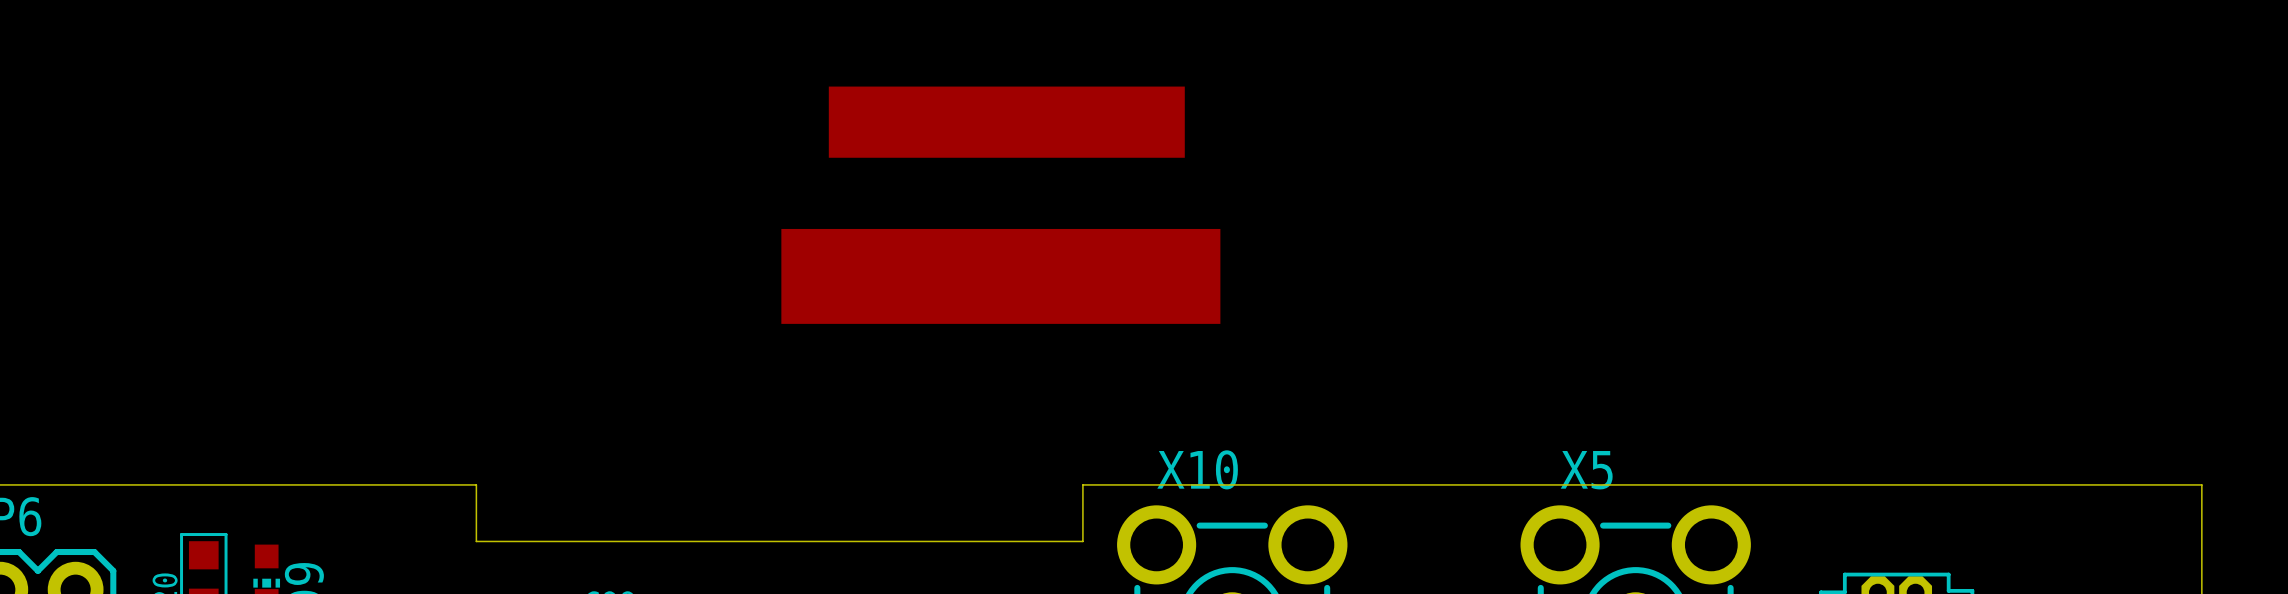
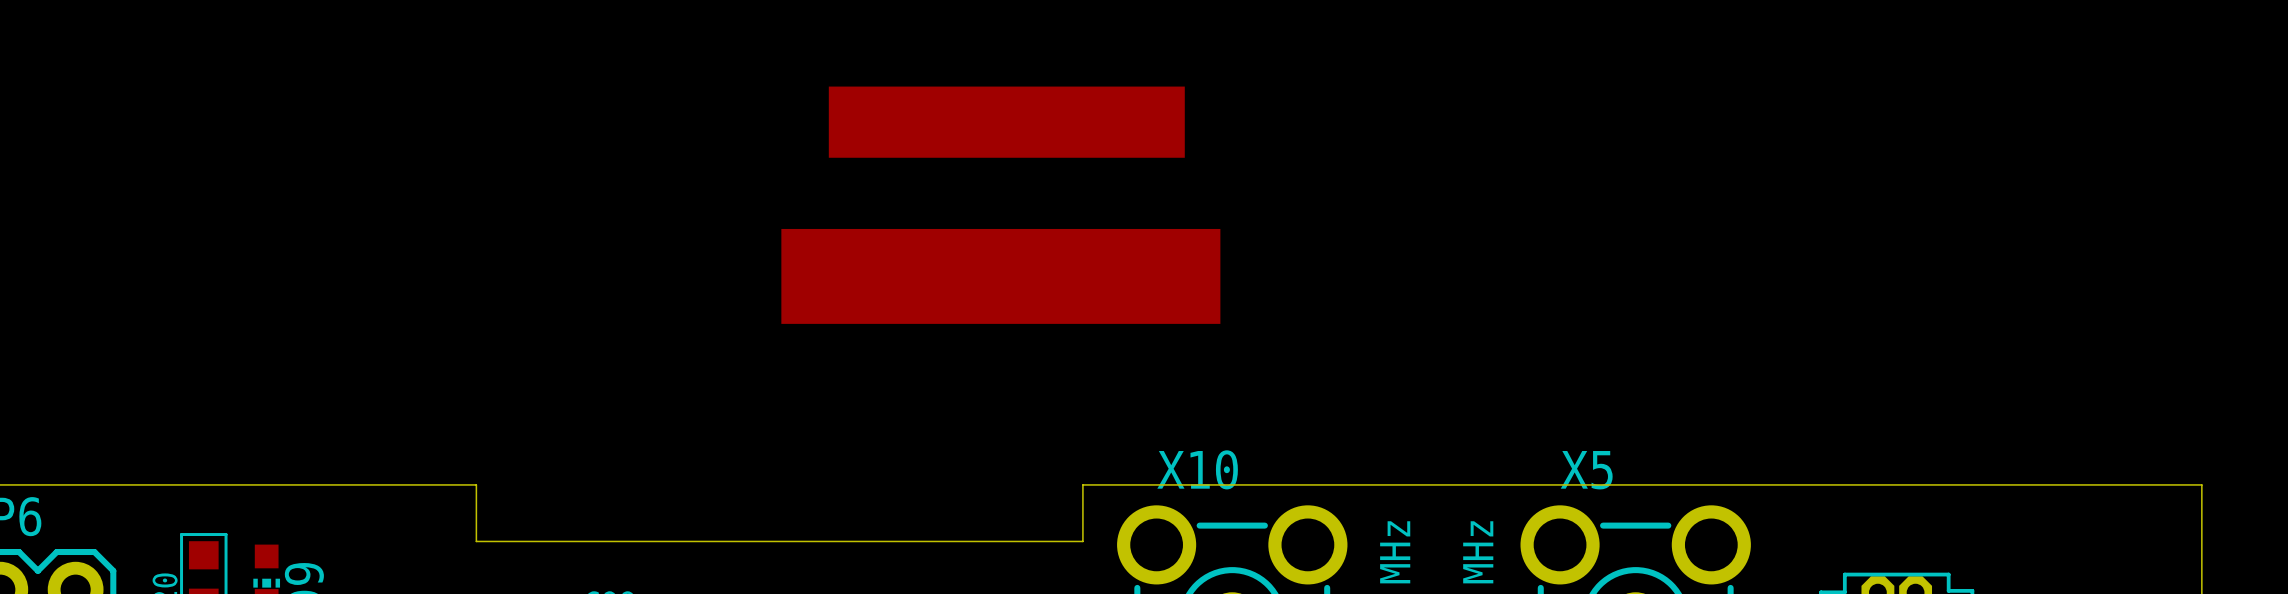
text: none -> MHz (1395, 552)
text: none -> MHz (1478, 552)

